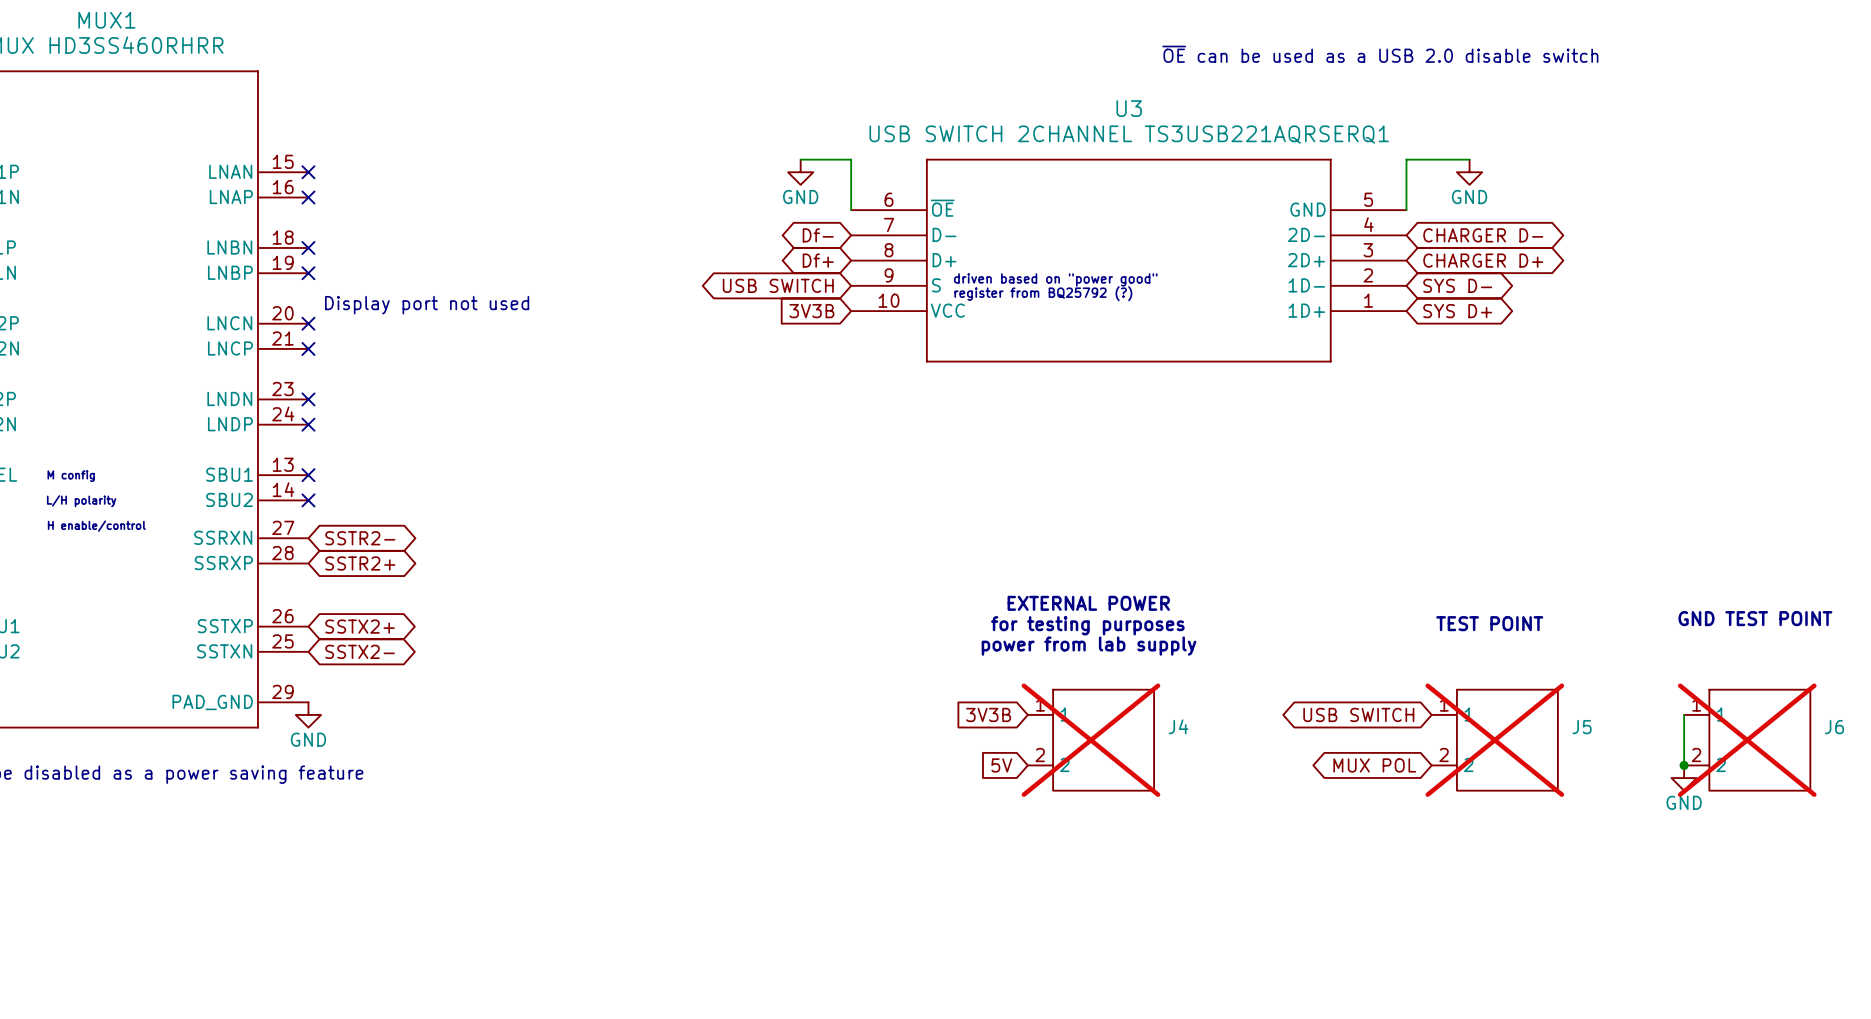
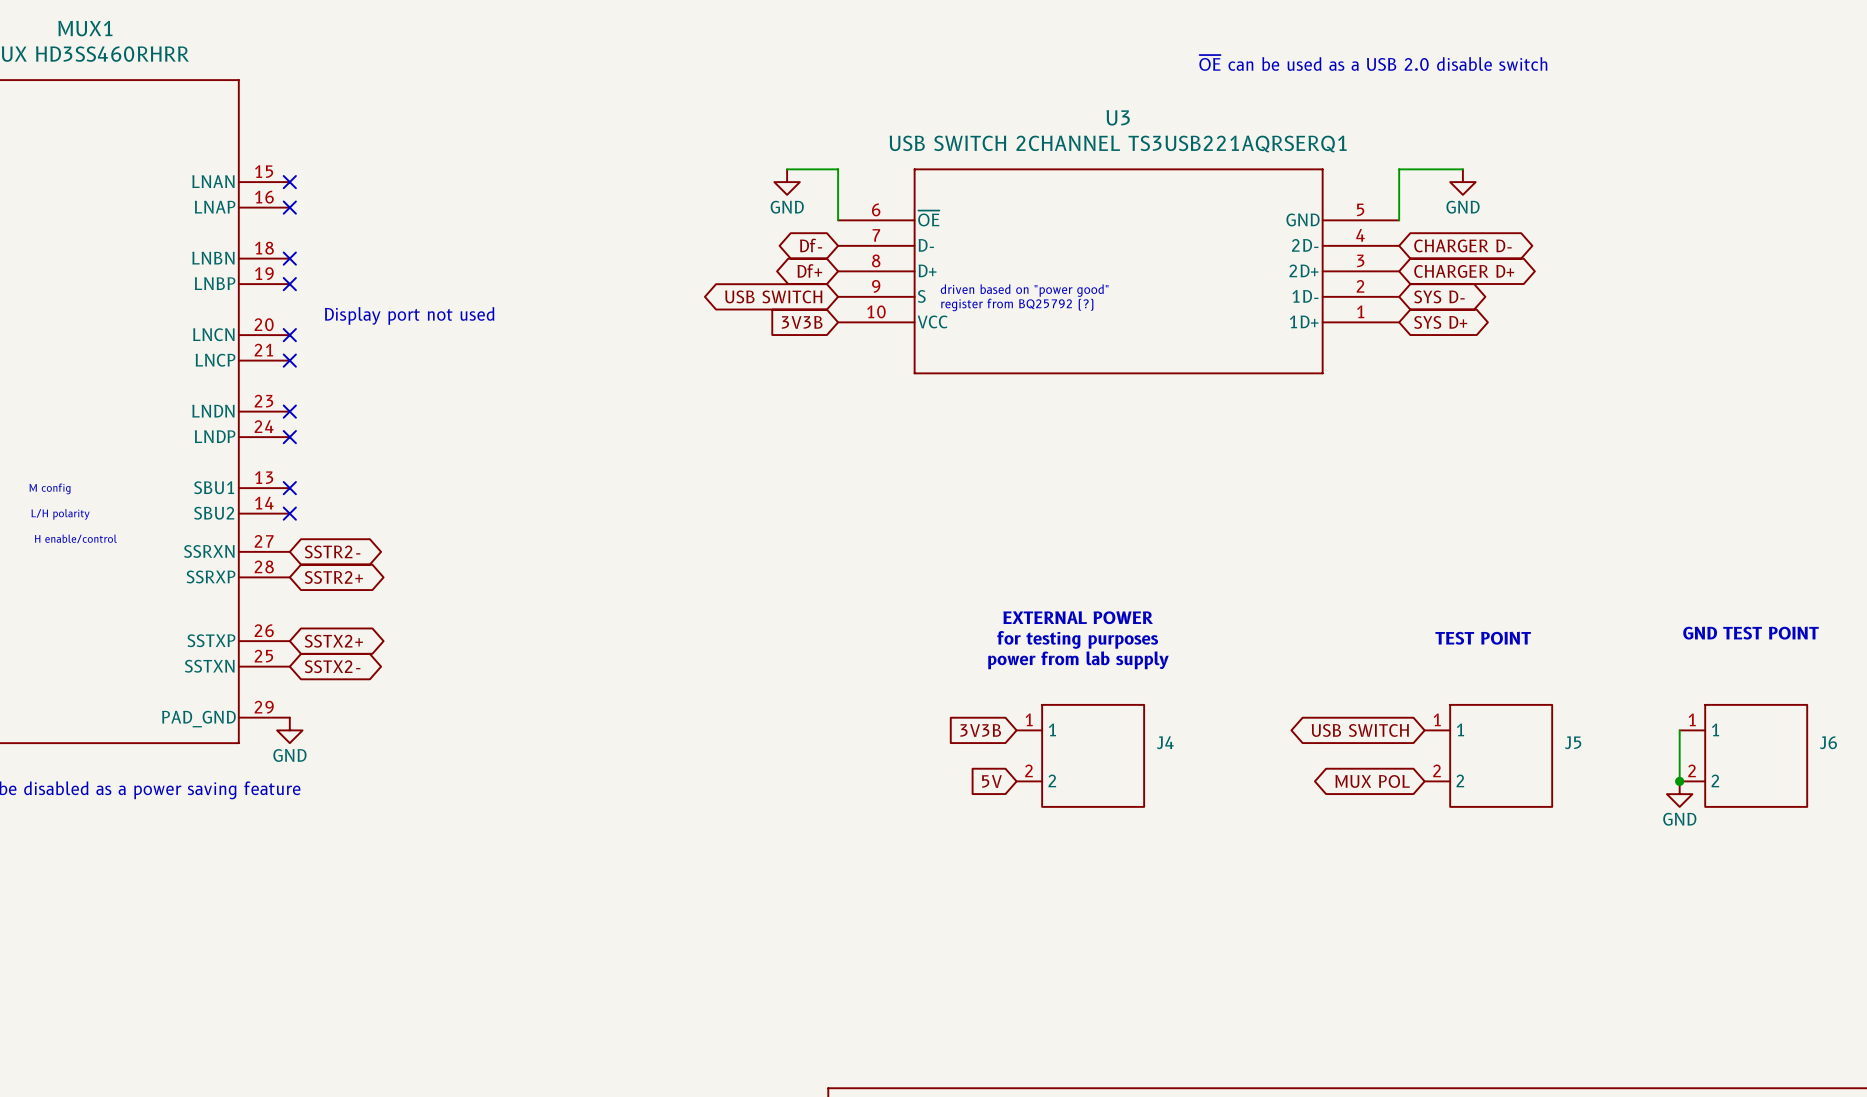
J4 do-not-place cross: (1090, 740) -> none
J5 do-not-place cross: (1494, 740) -> none
J6 do-not-place cross: (1747, 740) -> none

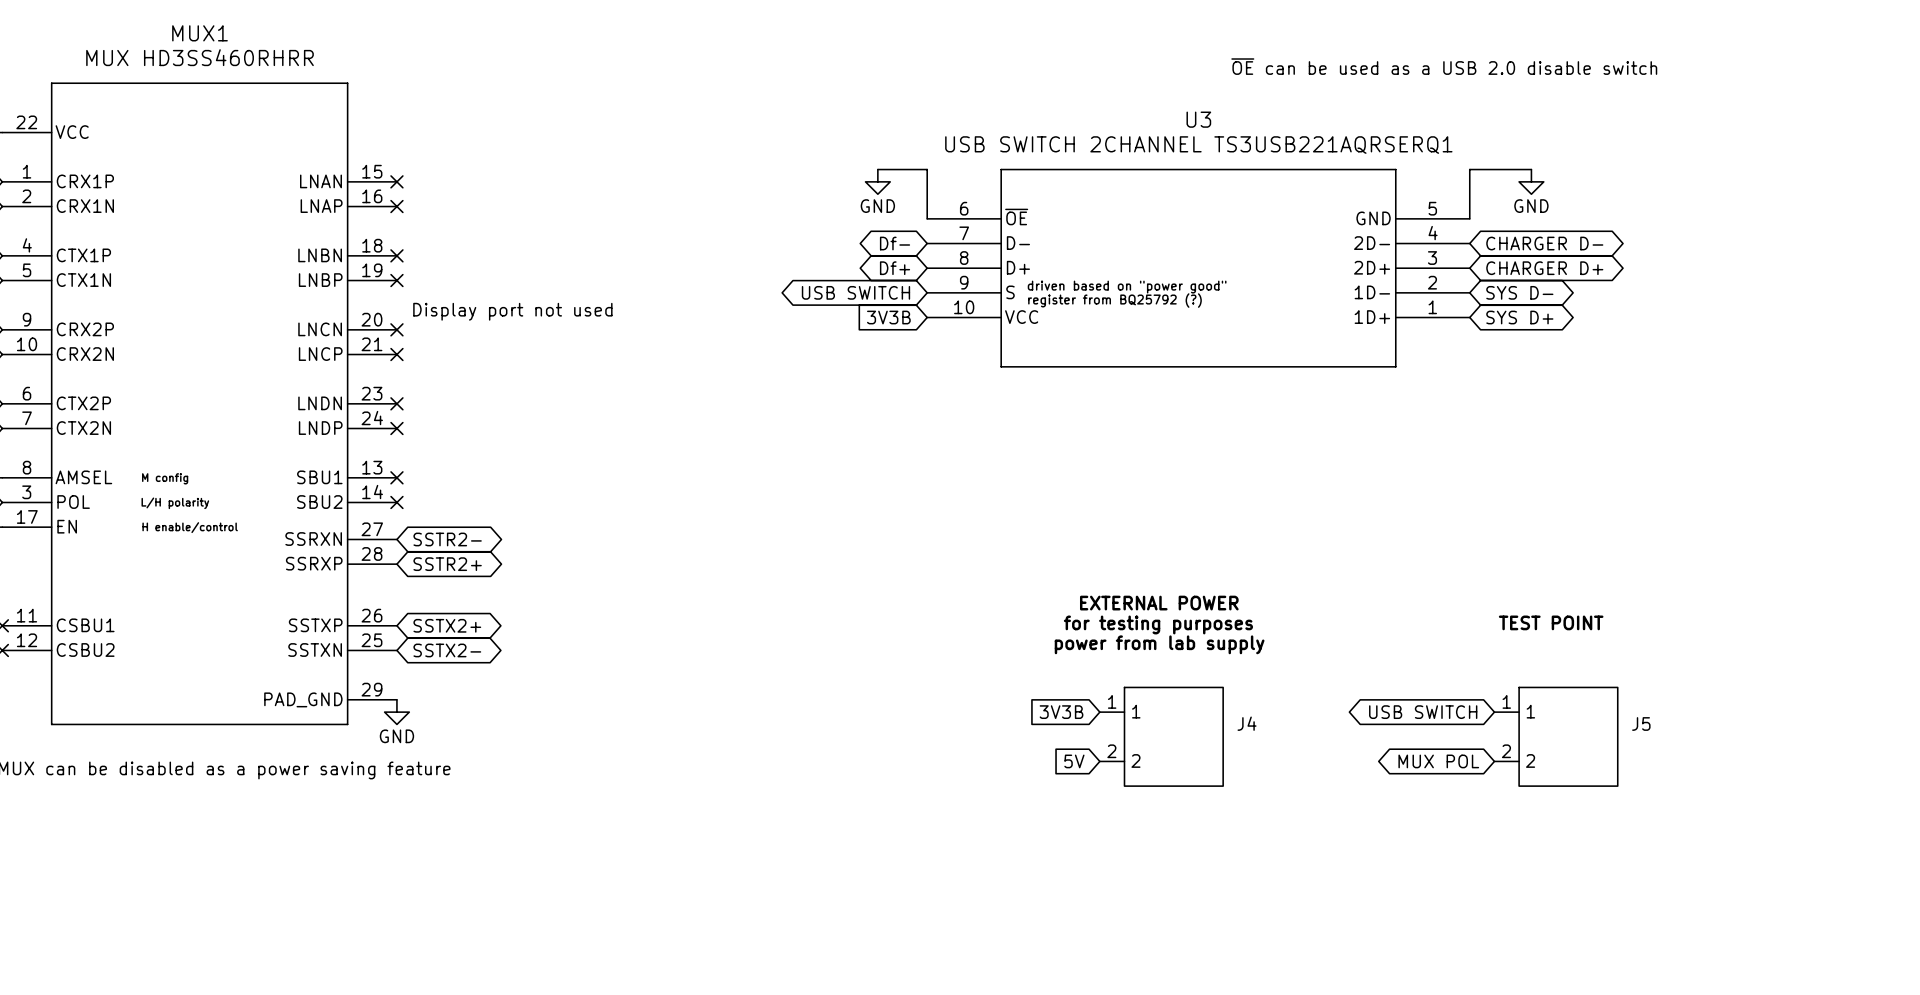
text: GND TEST POINT (1750, 633) -> none
wire: (1679, 730) (1679, 781) -> none
J6: (1743, 755) -> none
junction: (1679, 781) -> none
power symbol: GND (1679, 794) -> none

